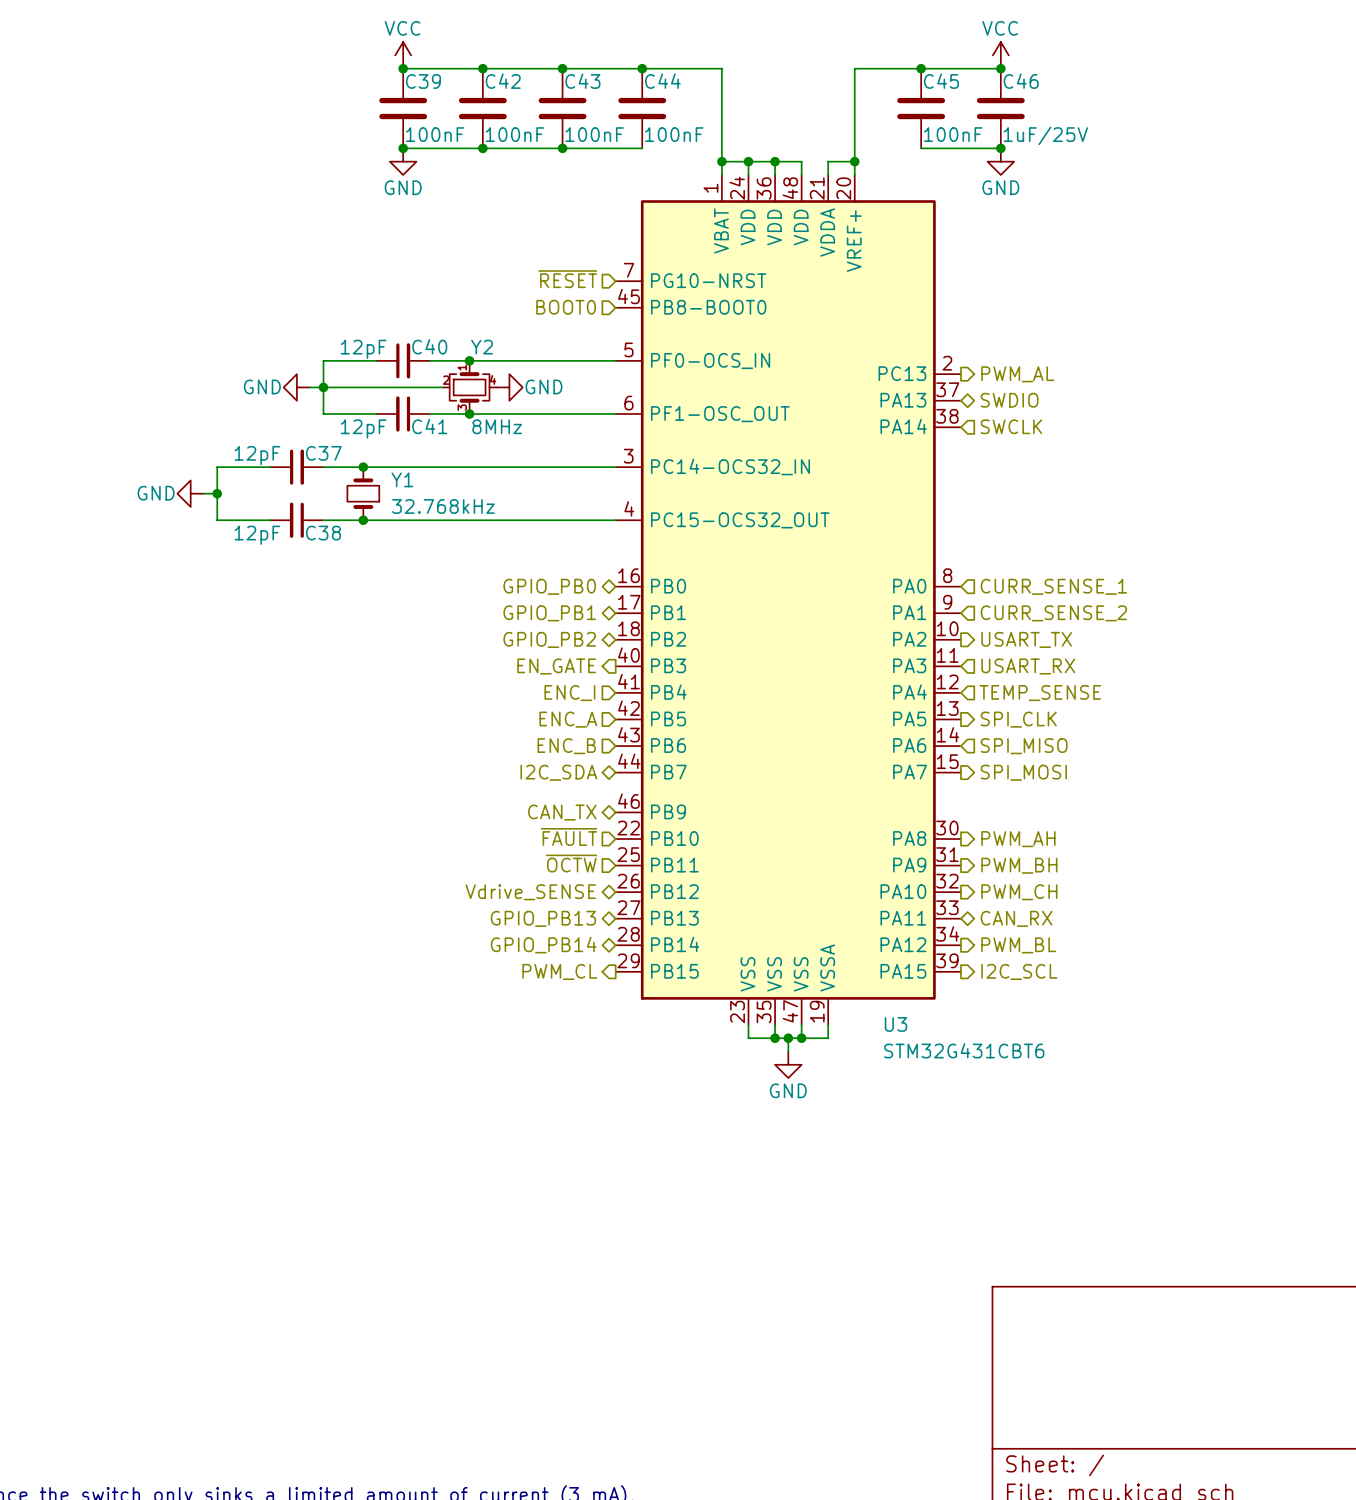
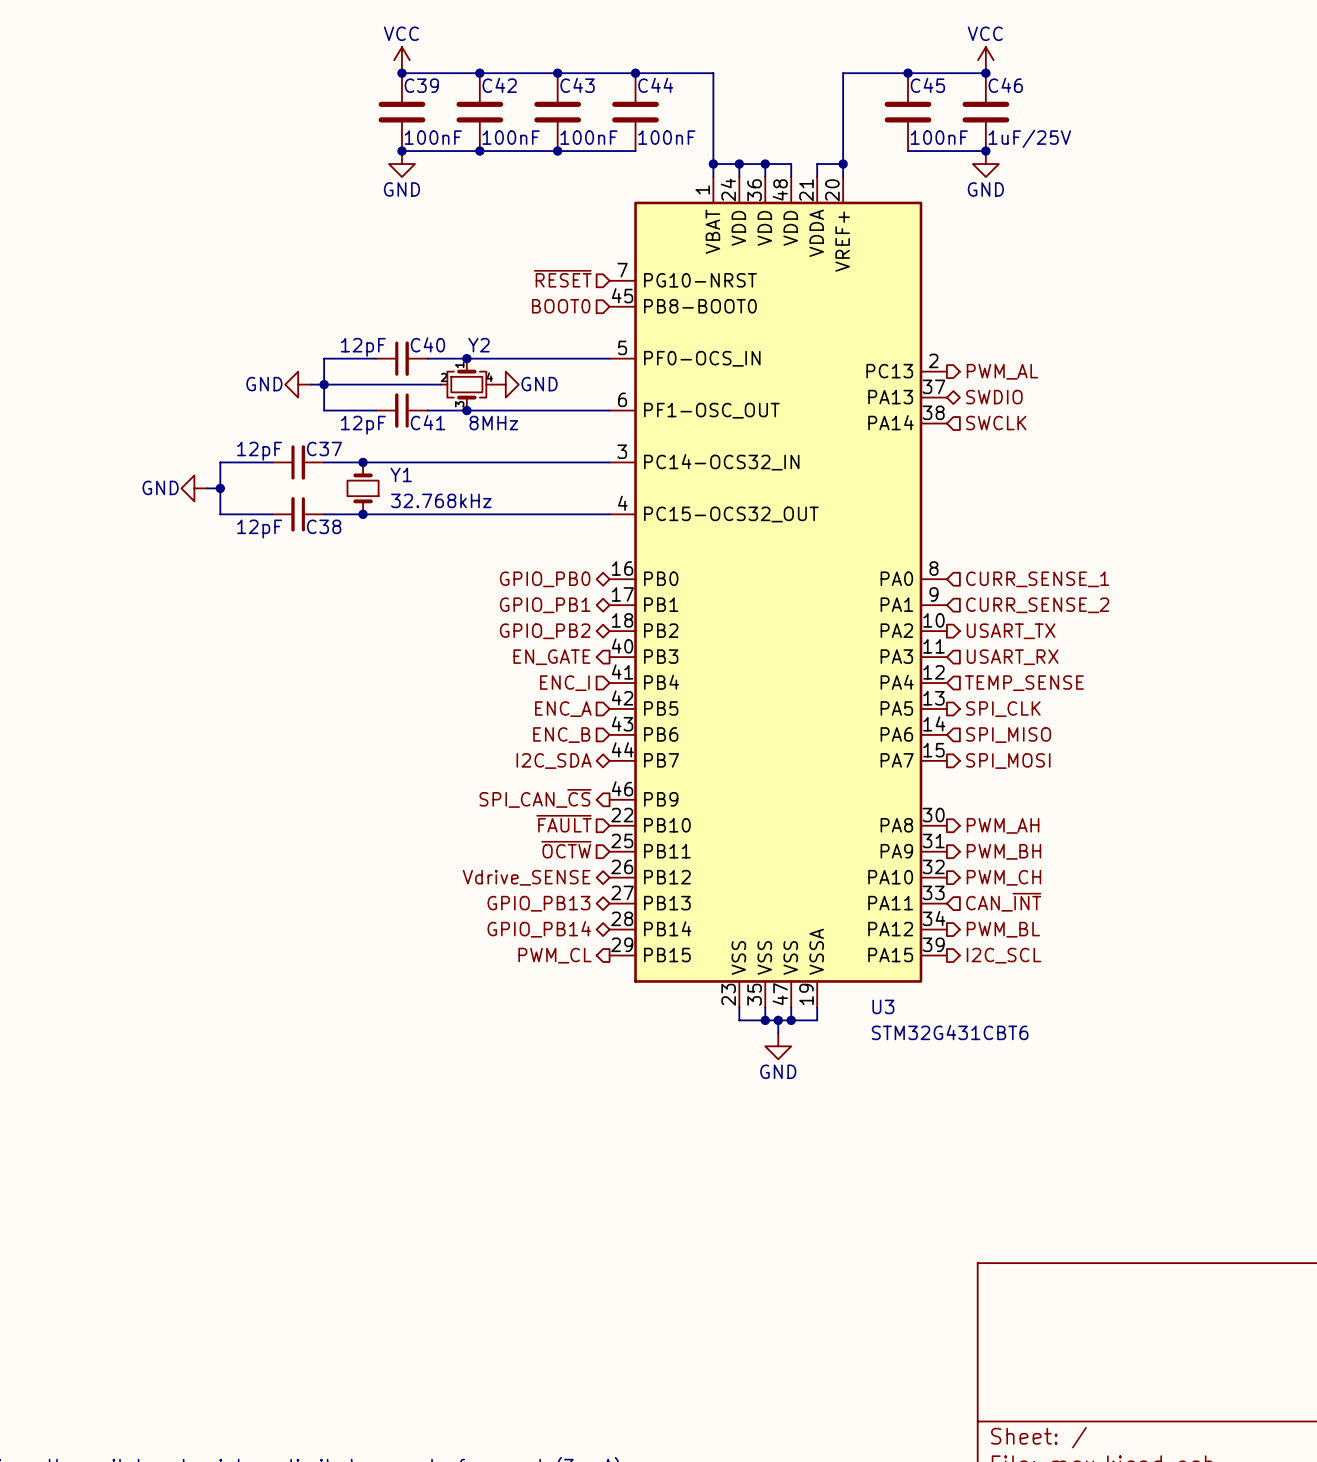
hierarchical label shape: bidirectional (562, 812) -> output (535, 798)
hierarchical label: CAN_TX (562, 812) -> SPI_CAN_~{CS} (535, 798)
hierarchical label shape: bidirectional (1016, 918) -> input (1003, 902)
hierarchical label: CAN_RX (1016, 918) -> CAN_~{INT} (1003, 902)

